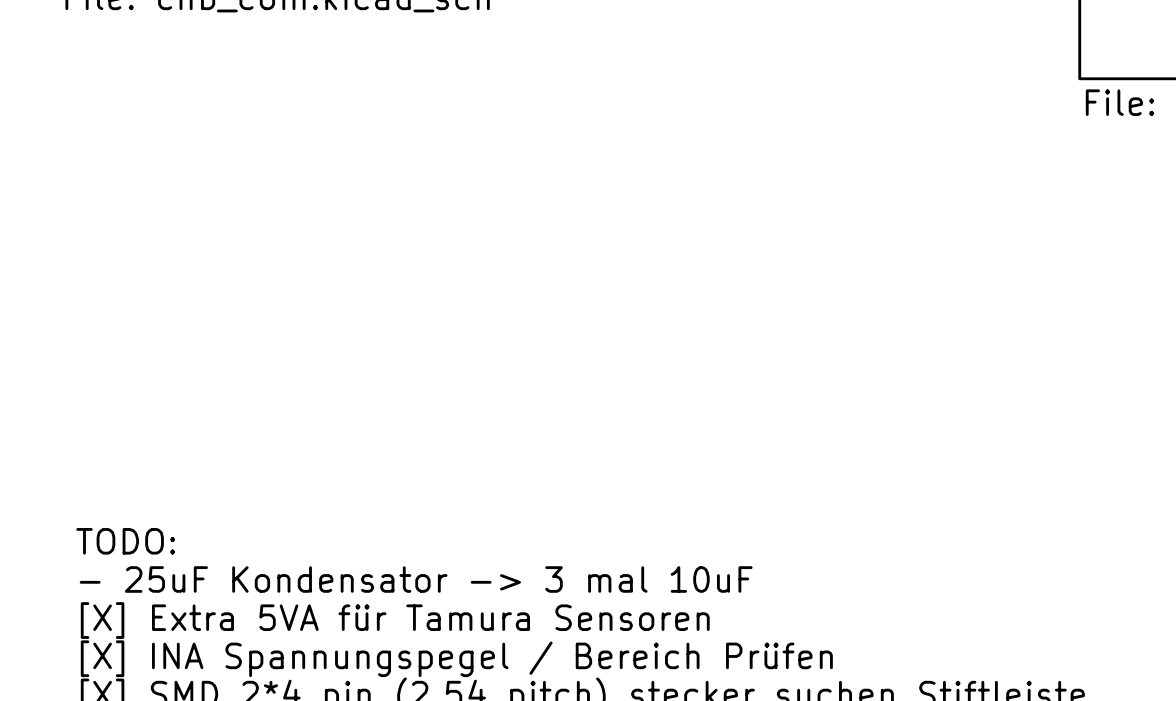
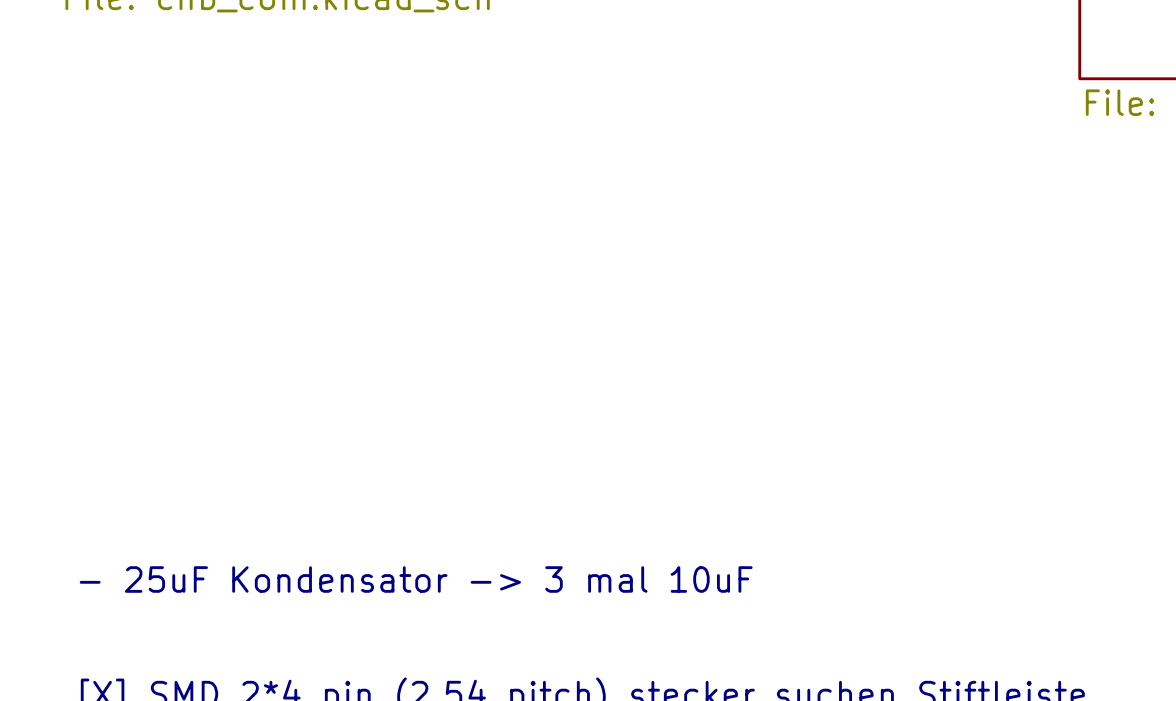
text: TODO: (125, 541) -> none
text: [X] Extra 5VA für Tamura Sensoren (395, 620) -> none
text: [X] INA Spannungspegel / Bereich Prüfen (456, 658) -> none

